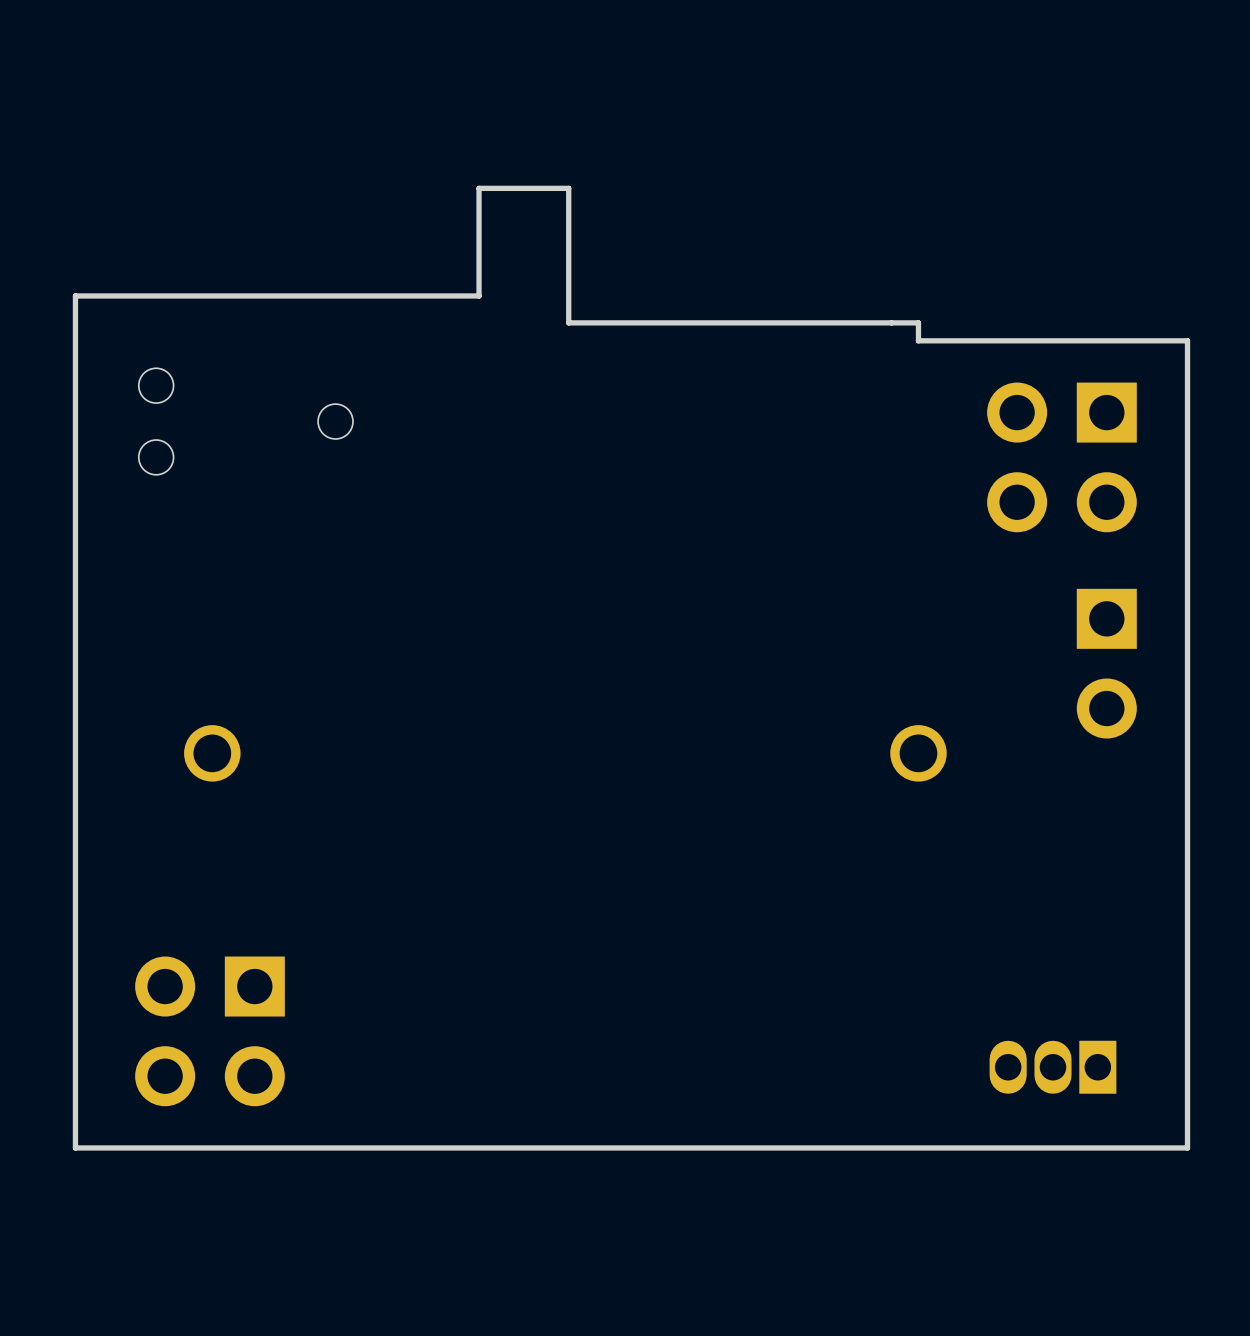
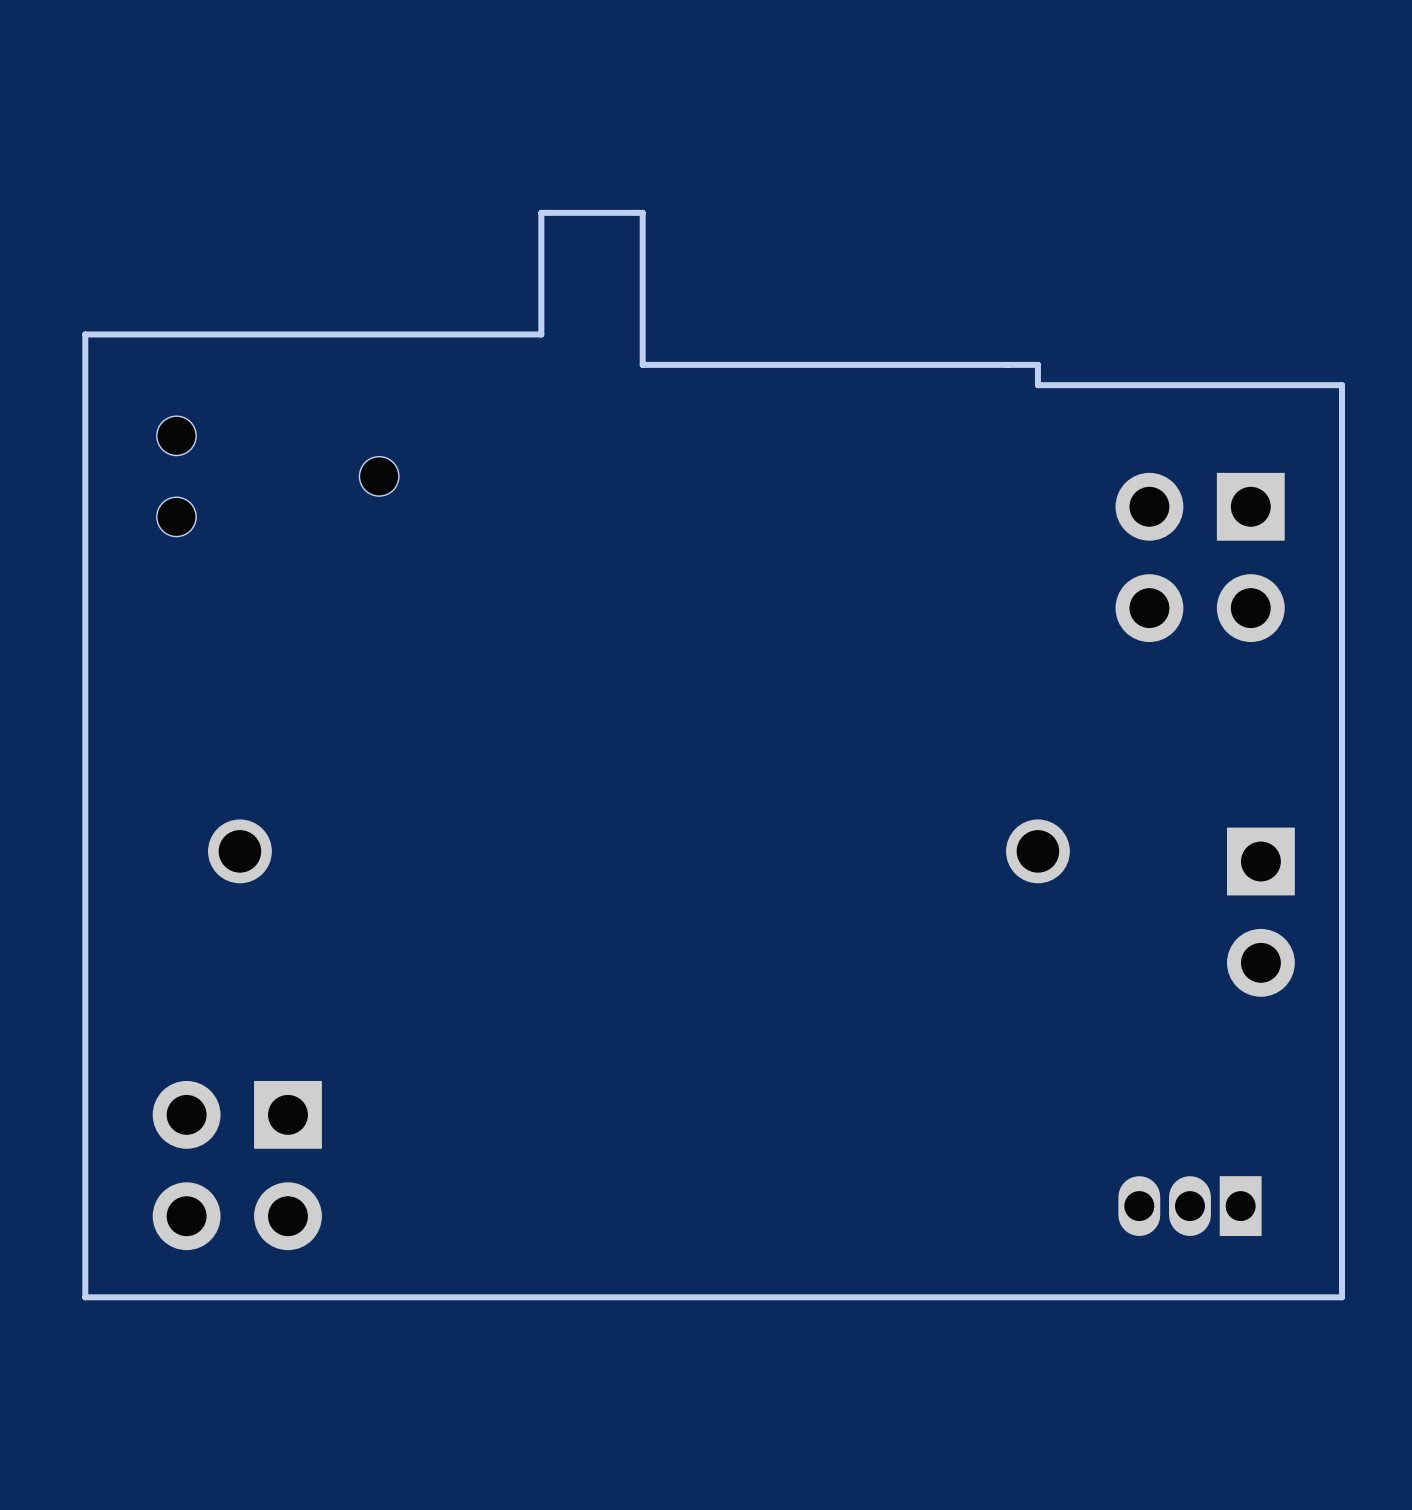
part position: (1061, 457) -> (1200, 557)
part position: (1106, 663) -> (1260, 912)

